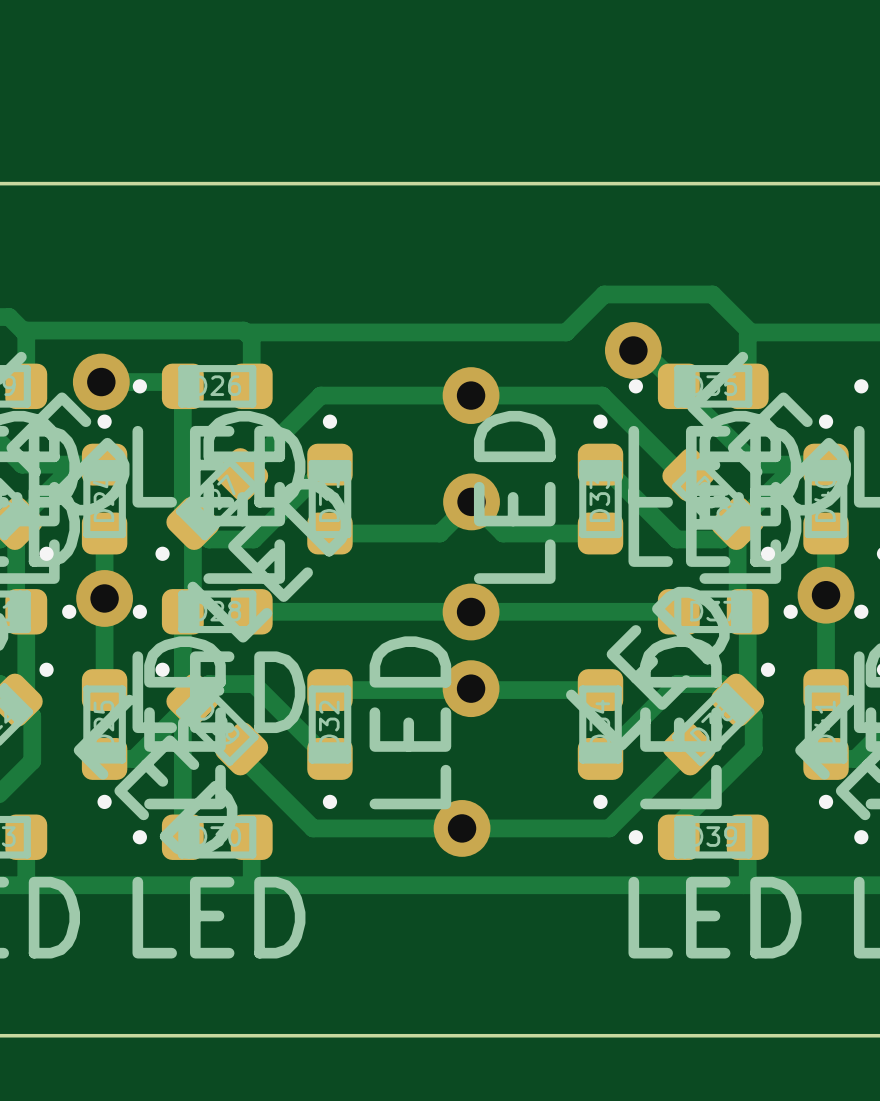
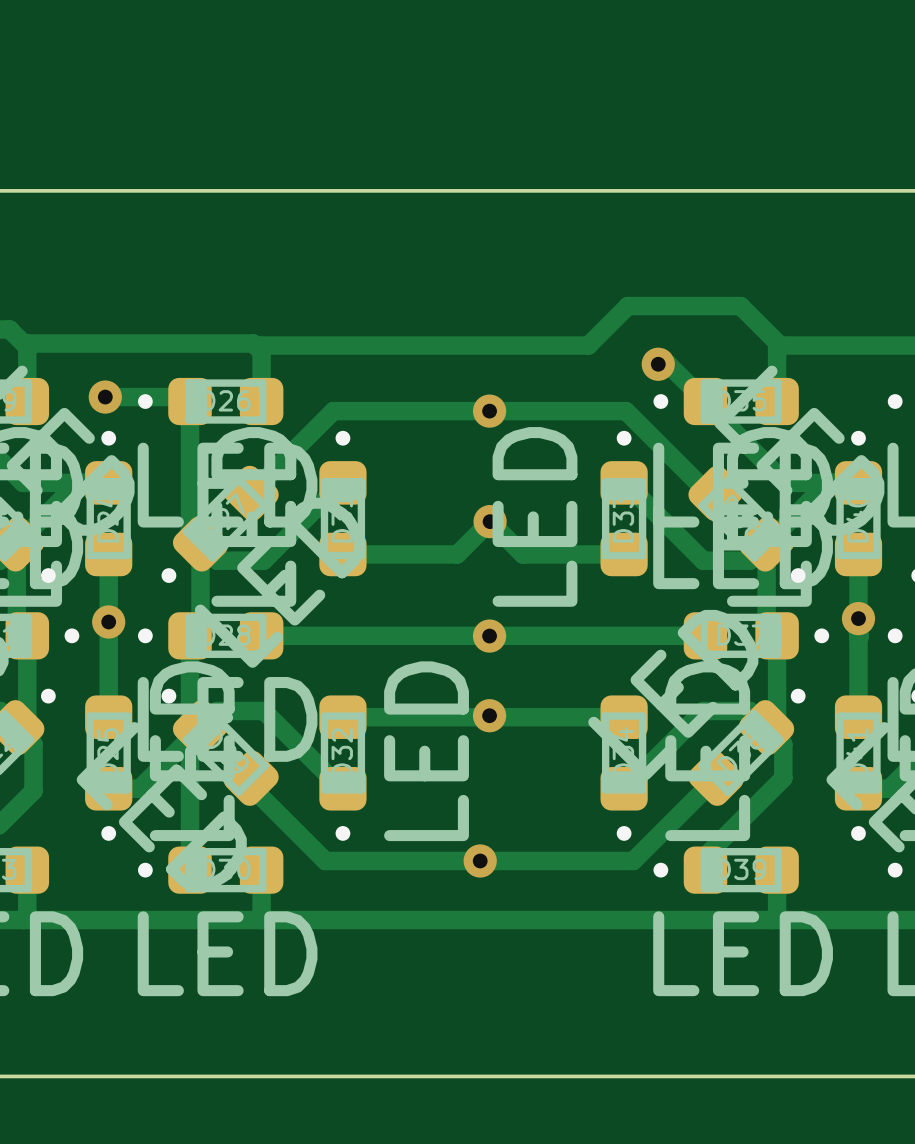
via size: [604, 322, 662, 379] -> [641, 347, 675, 381]
via size: [72, 353, 130, 411] -> [88, 380, 122, 414]
via size: [442, 367, 500, 424] -> [472, 394, 507, 428]
via size: [443, 473, 500, 531] -> [473, 505, 507, 539]
via size: [797, 566, 855, 624] -> [841, 601, 876, 636]
via size: [76, 570, 133, 627] -> [92, 605, 126, 639]
via size: [442, 583, 500, 641] -> [472, 619, 507, 653]
via size: [442, 660, 500, 718] -> [472, 699, 507, 733]
via size: [433, 800, 491, 857] -> [463, 844, 497, 878]

